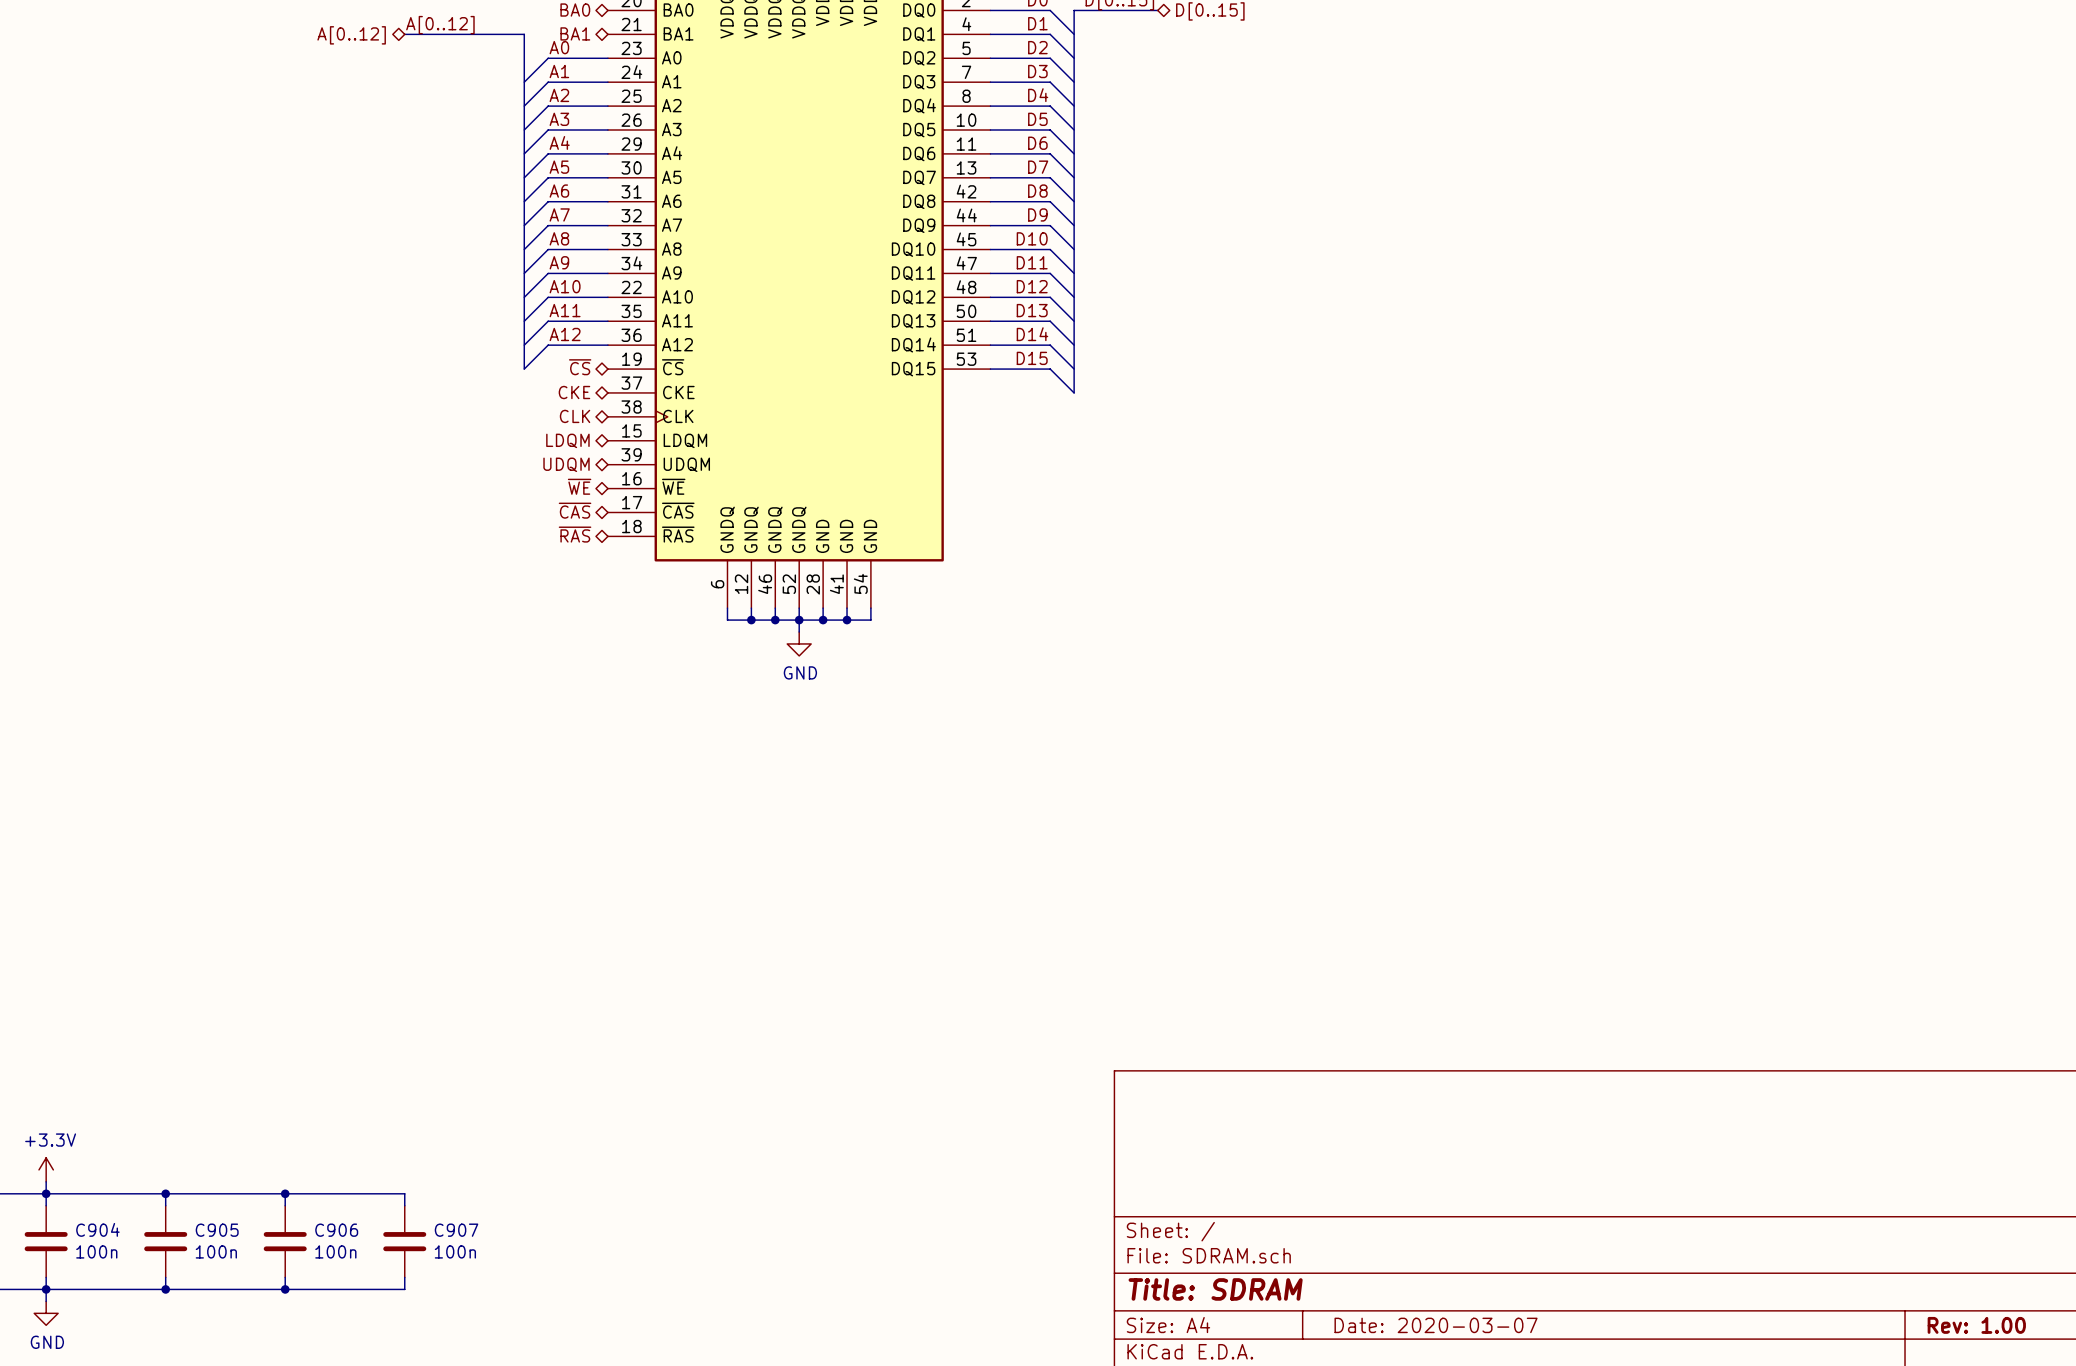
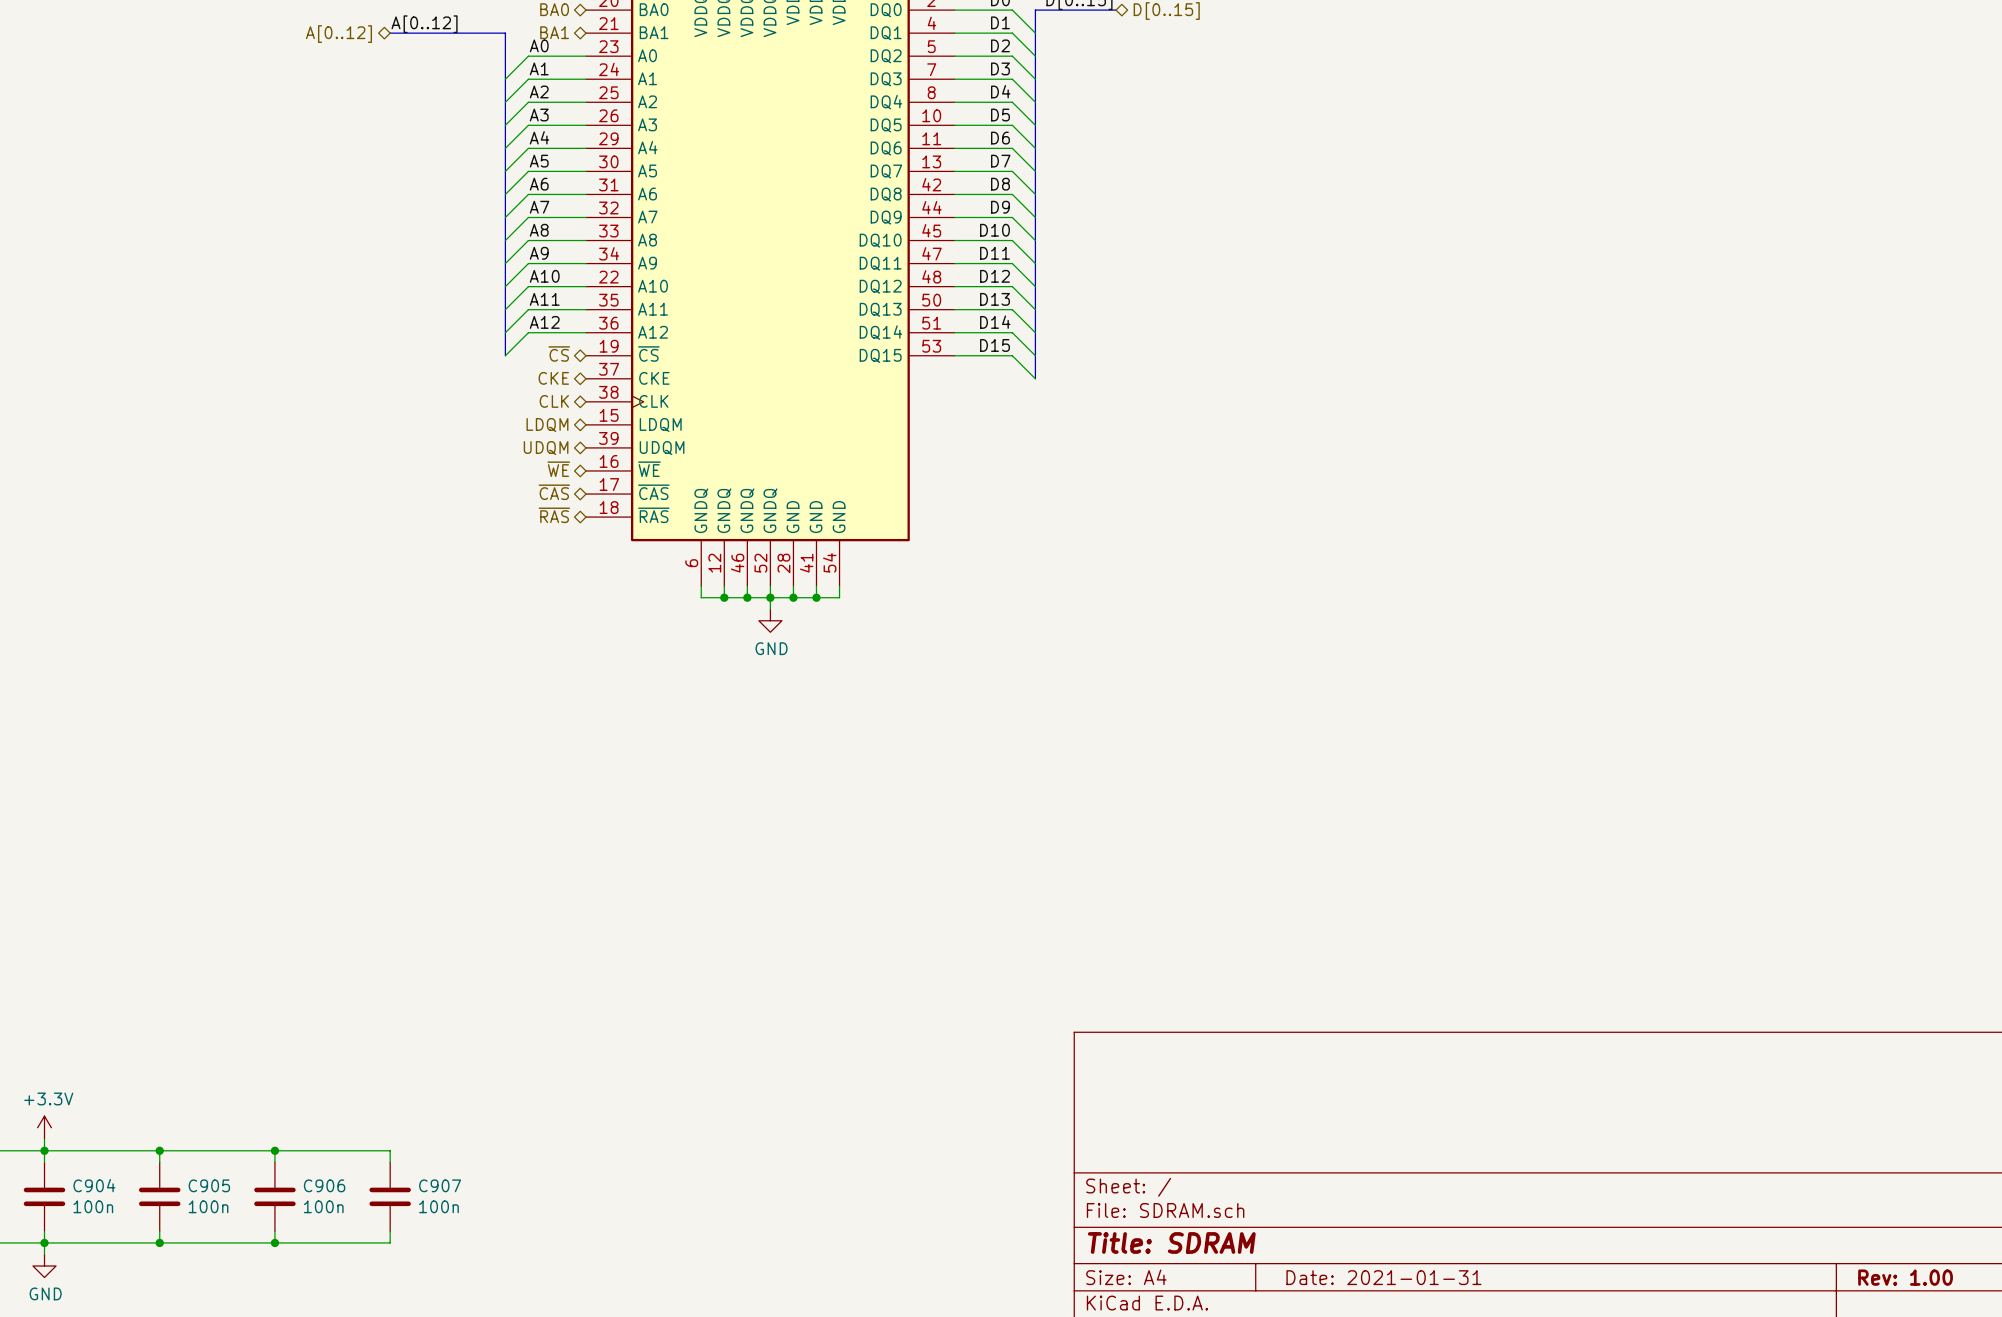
title block: Date: 2020-03-07 (1436, 1325) -> Date: 2021-01-31 (1383, 1277)

